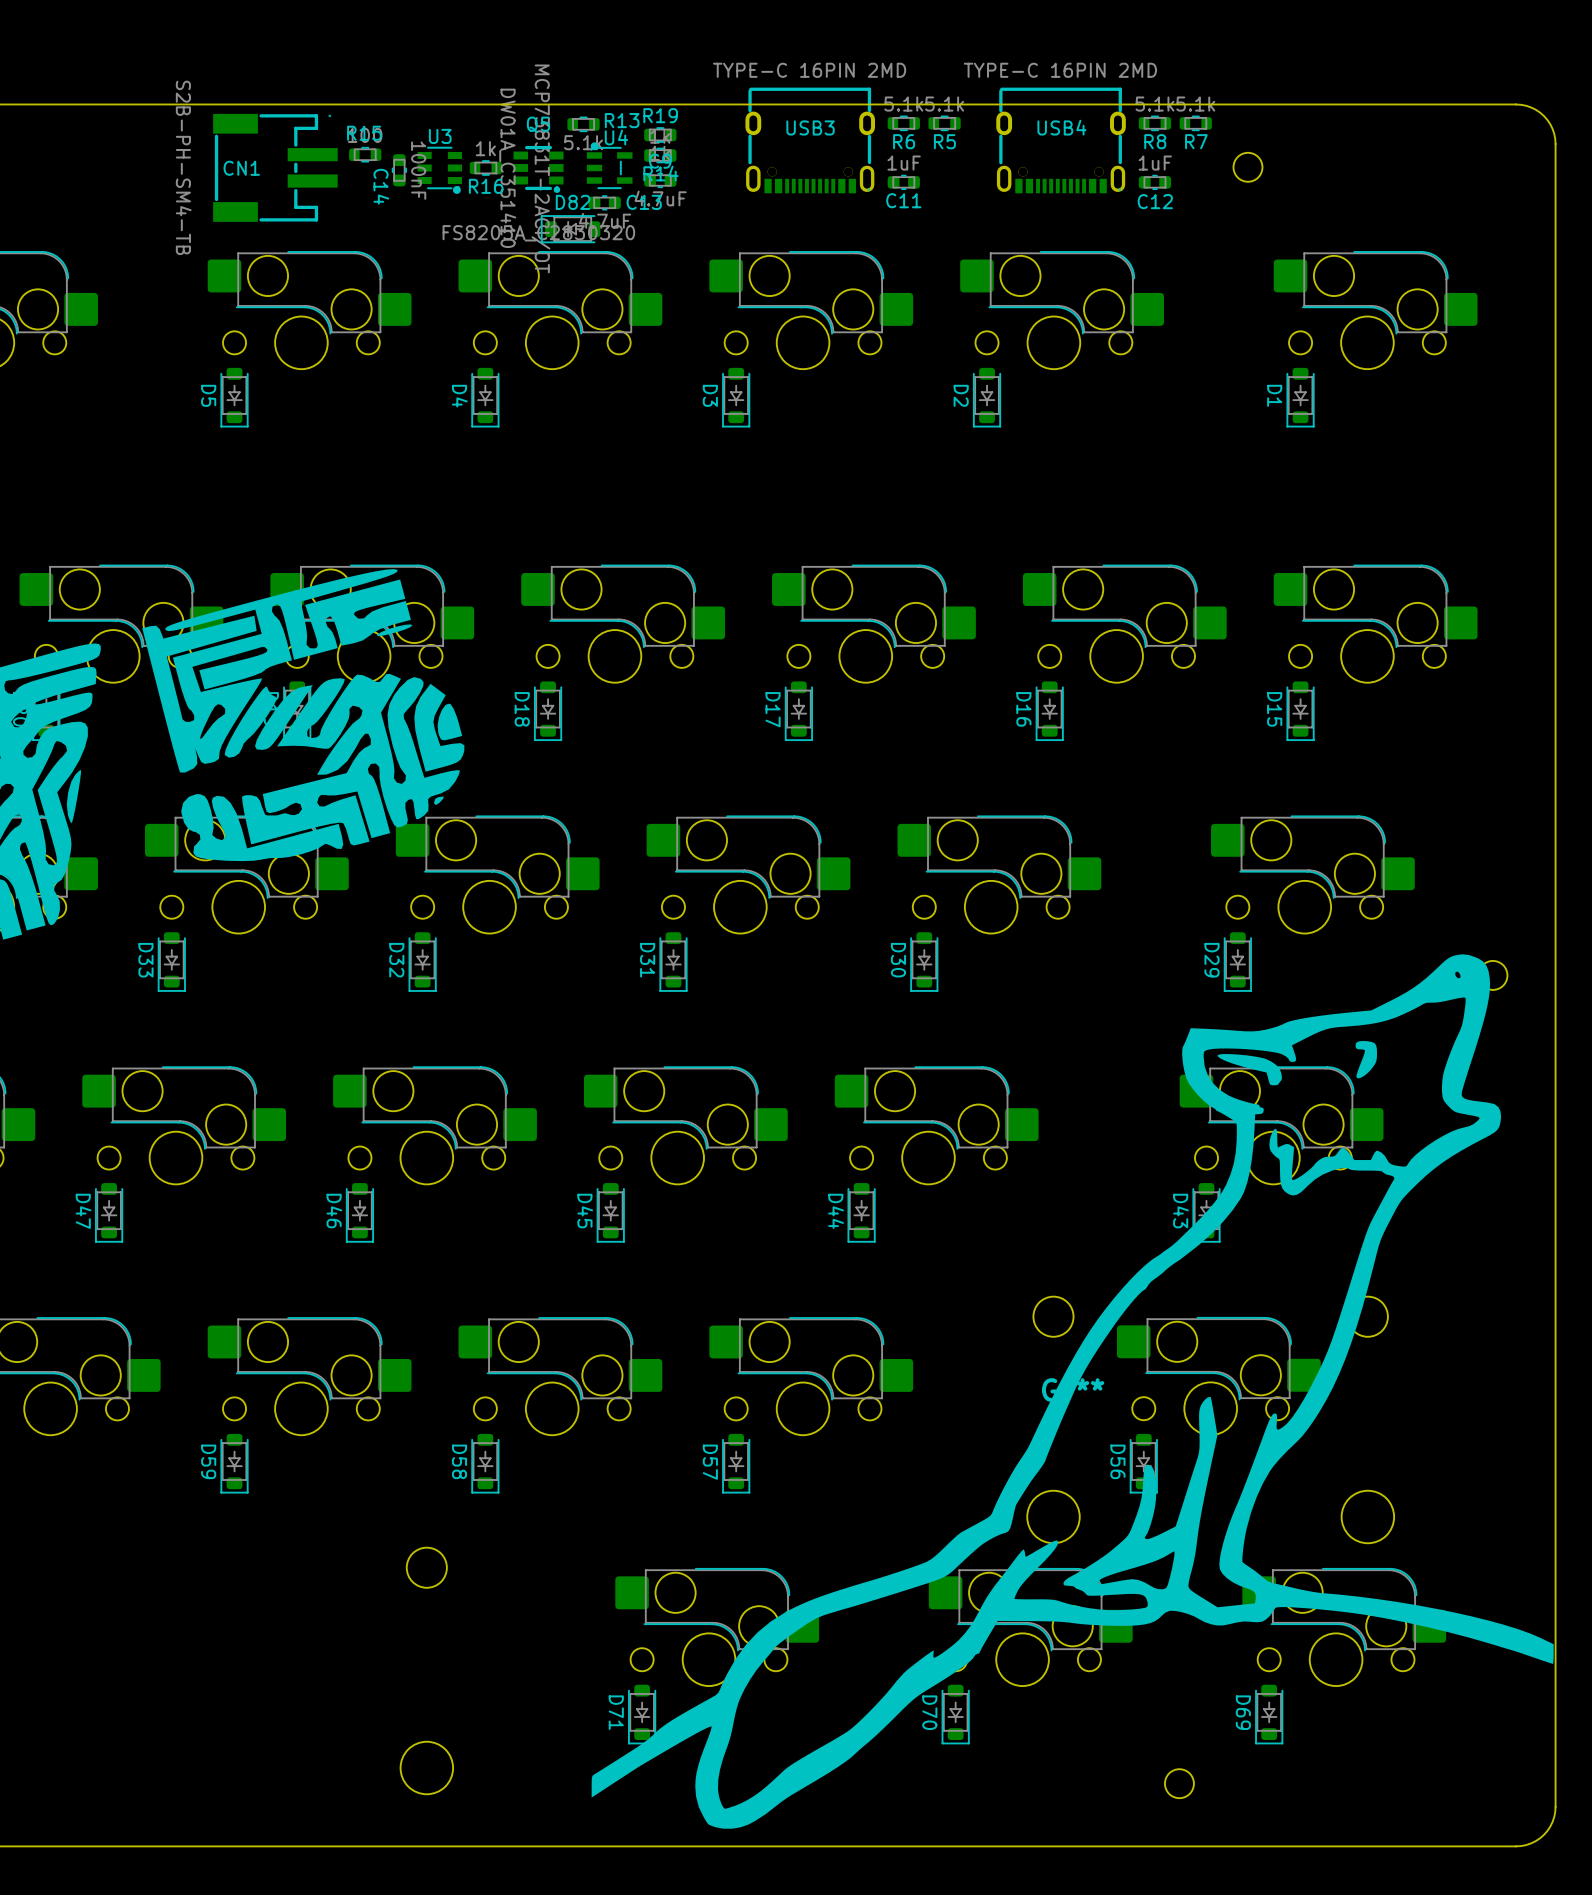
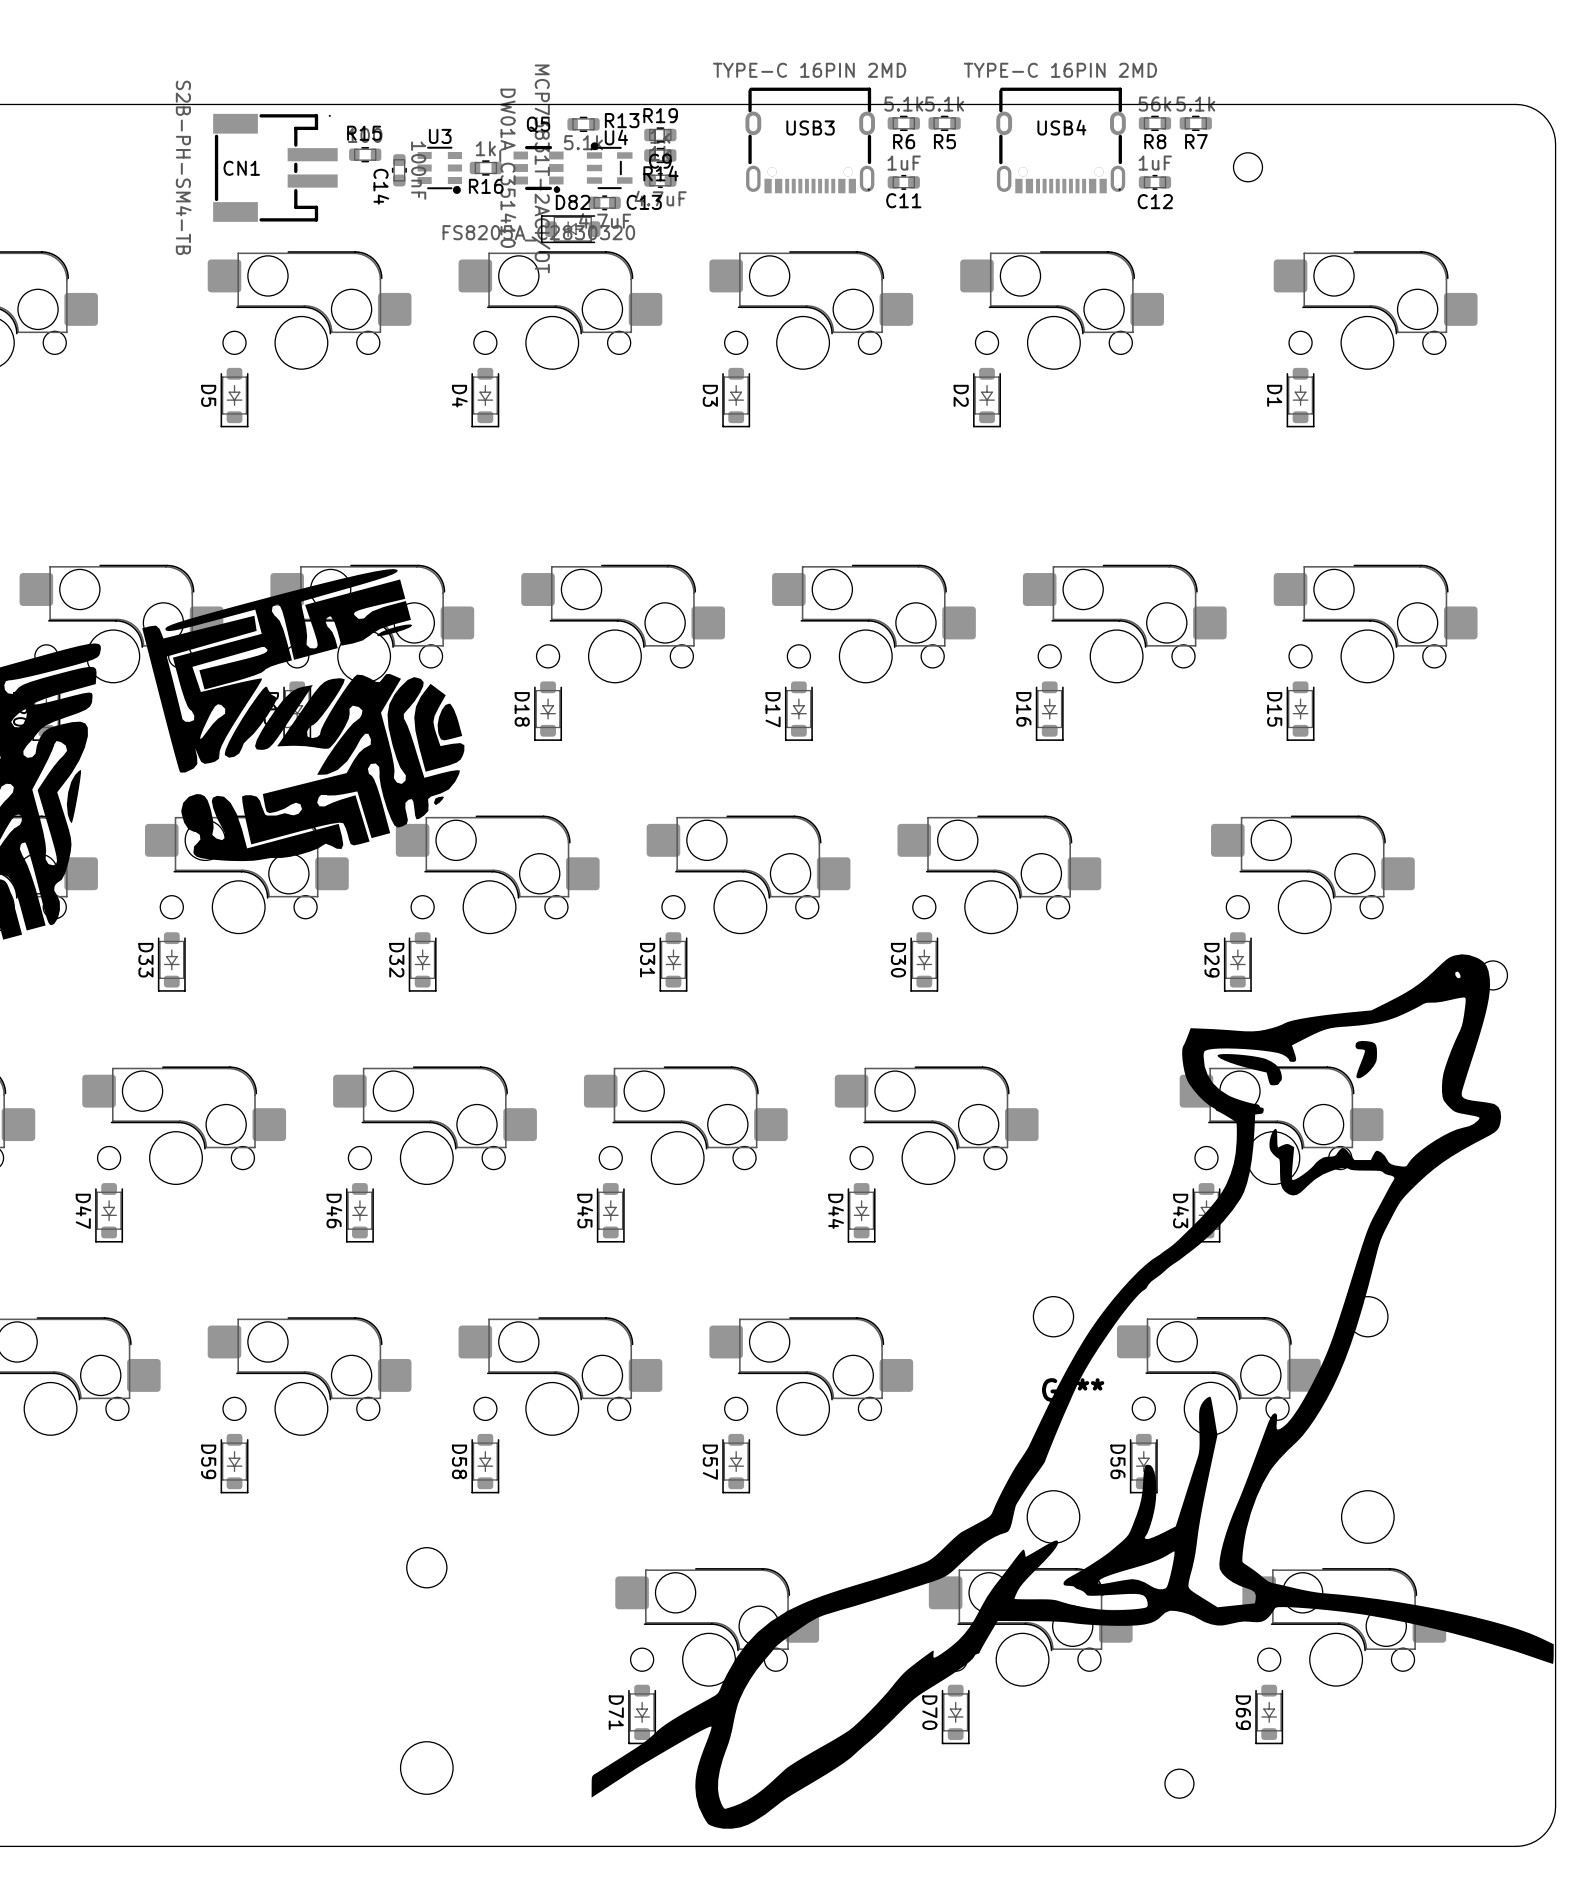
R8 value: 5.1k (1154, 104) -> 56k (1154, 104)

